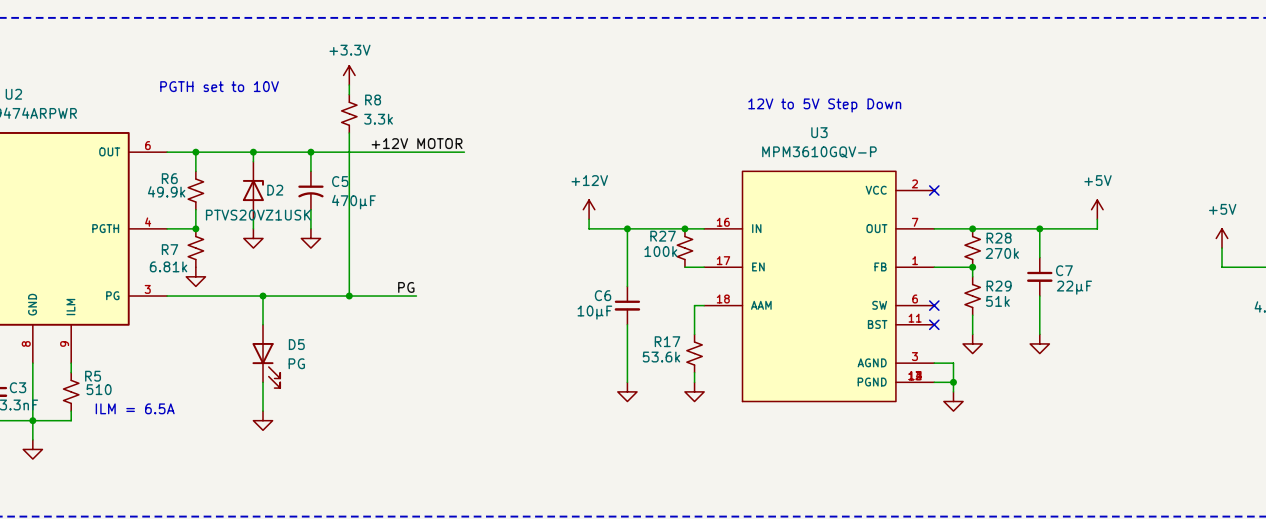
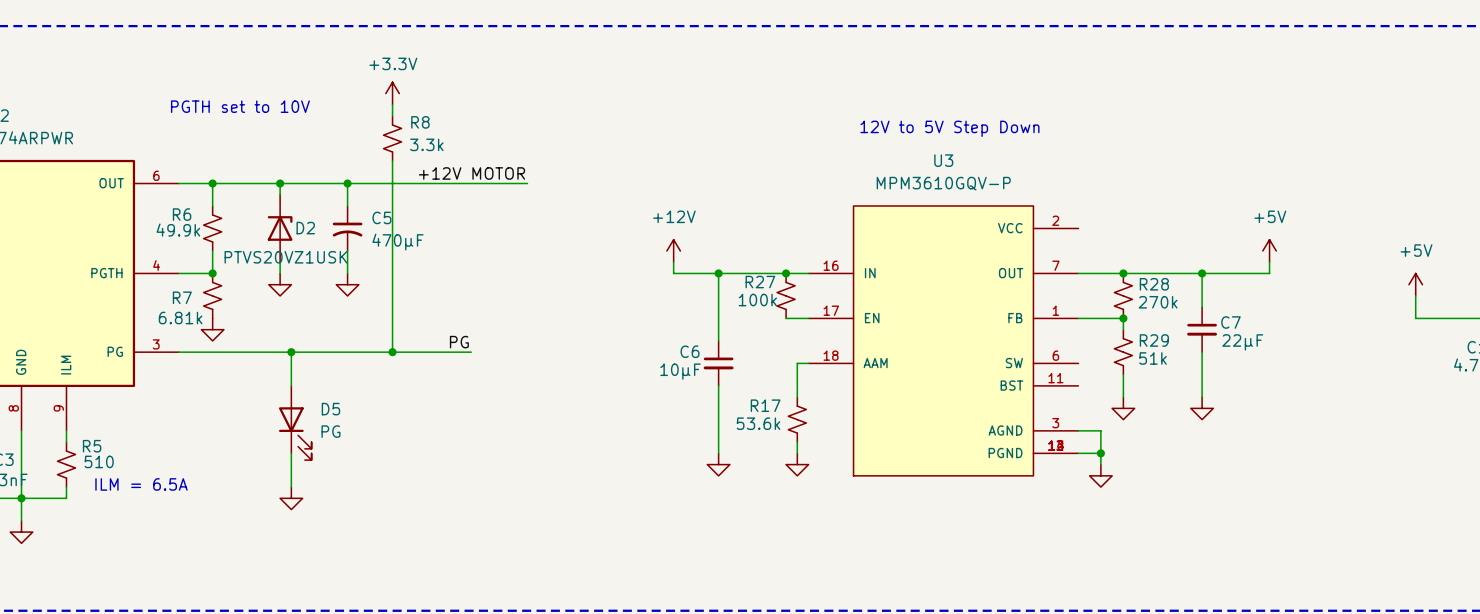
no-connect mark: (934, 190) -> none
no-connect mark: (934, 305) -> none
no-connect mark: (934, 324) -> none

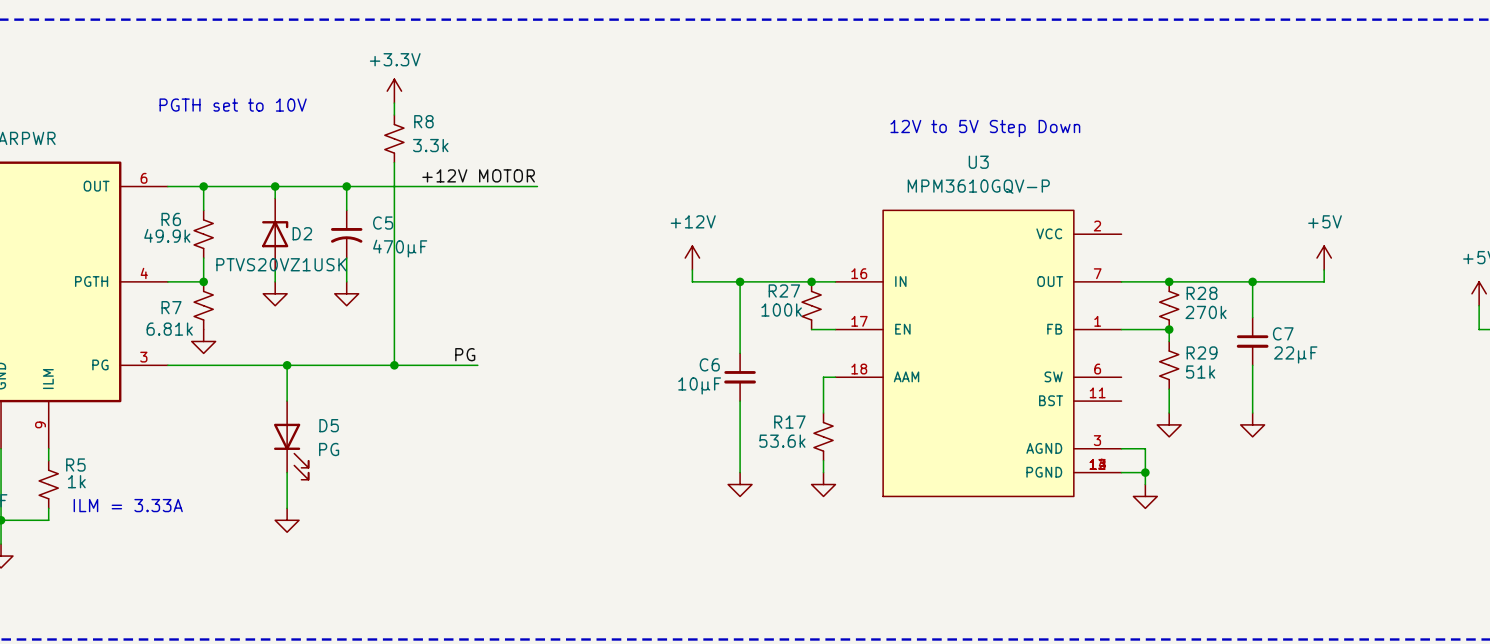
R5 value: 510 (99, 461) -> 1k (76, 481)
text: ILM = 6.5A (141, 484) -> ILM = 3.33A (128, 505)

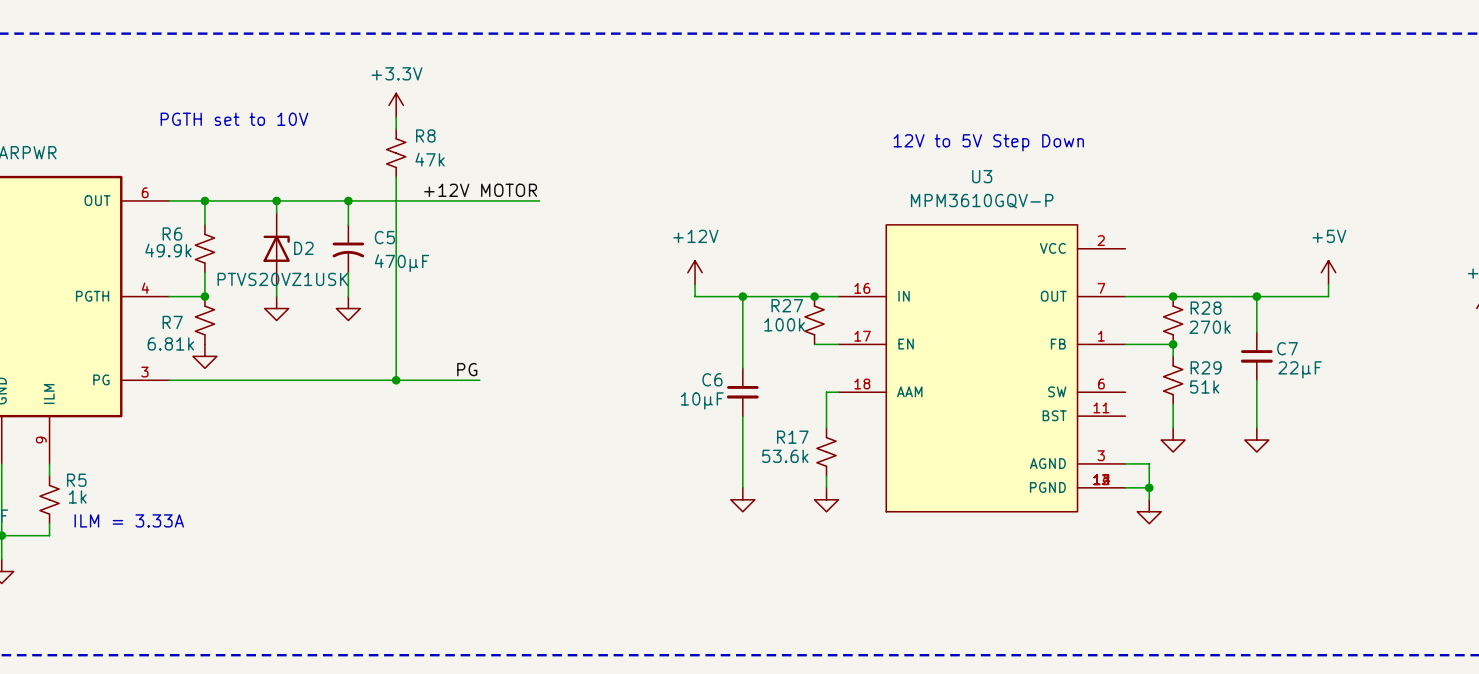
R8 value: 3.3k (430, 145) -> 47k (430, 159)
wire: (287, 365) (287, 401) -> none
junction: (287, 365) -> none
D5: PG (291, 440) -> none
wire: (287, 472) (287, 508) -> none
power symbol: (287, 520) -> none

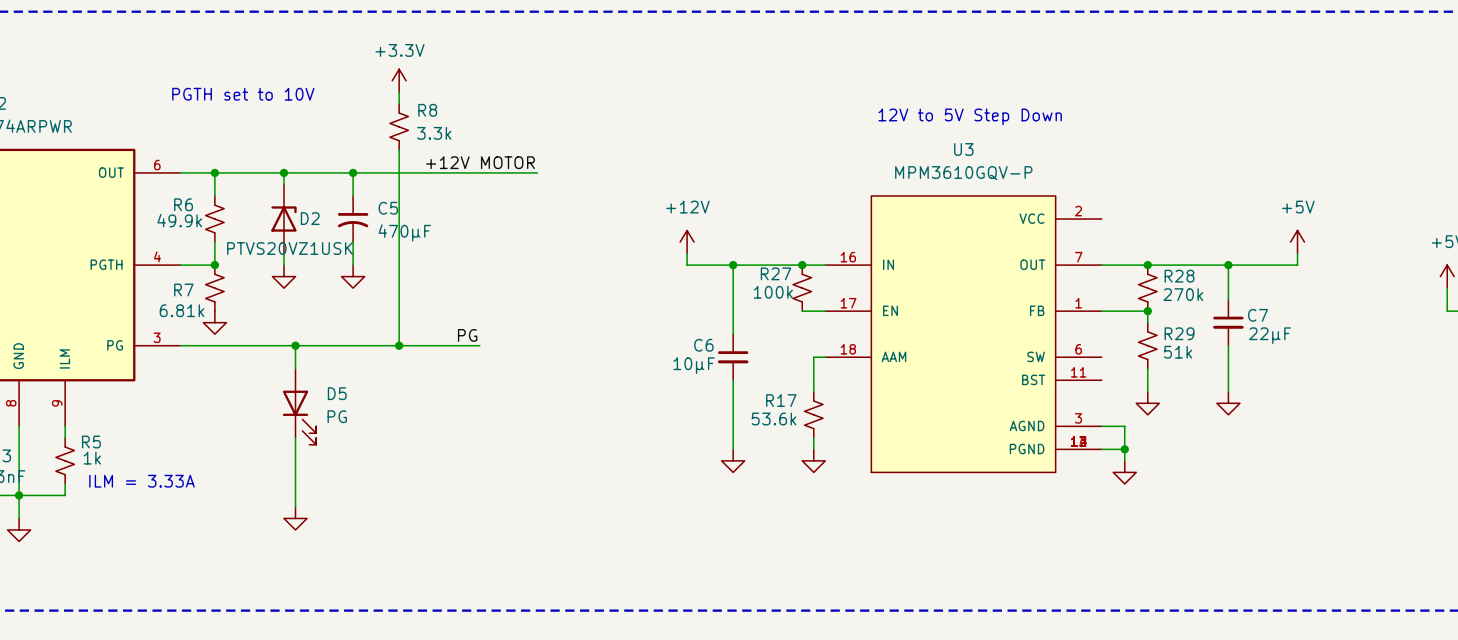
R8 value: 47k (430, 159) -> 3.3k (434, 133)
wire: none -> (295, 345) (295, 368)
junction: none -> (295, 345)
D5: none -> PG (299, 406)
wire: none -> (295, 437) (295, 506)
power symbol: none -> (295, 518)

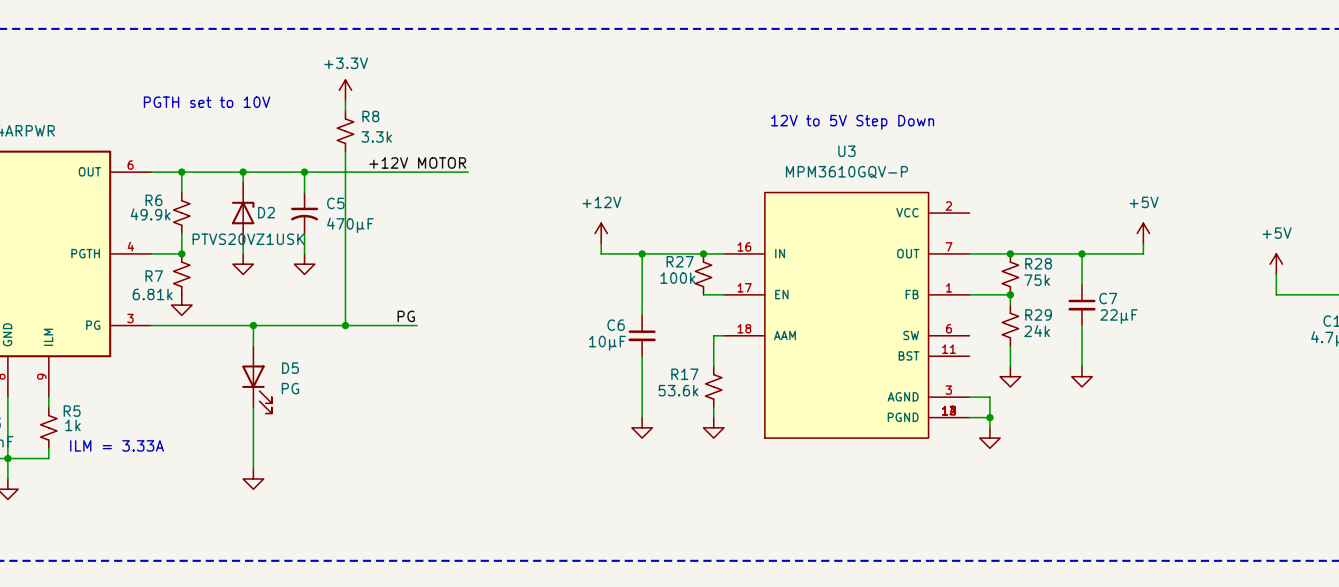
R28 value: 270k (1183, 294) -> 75k (1037, 280)
R29 value: 51k (1178, 352) -> 24k (1037, 331)

